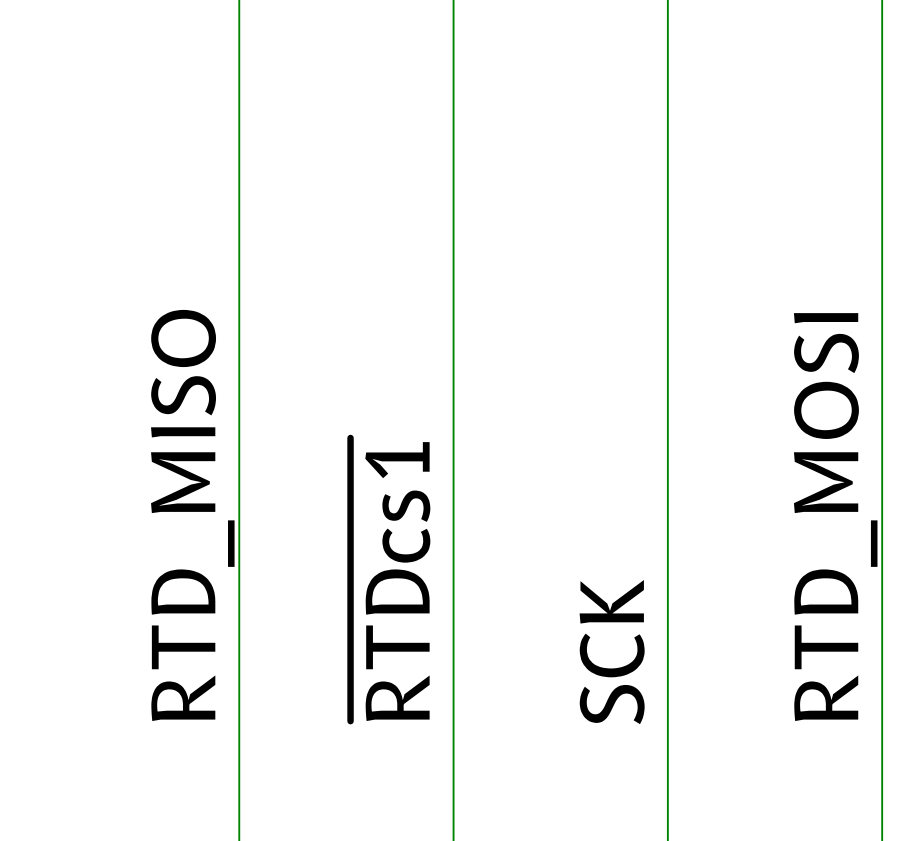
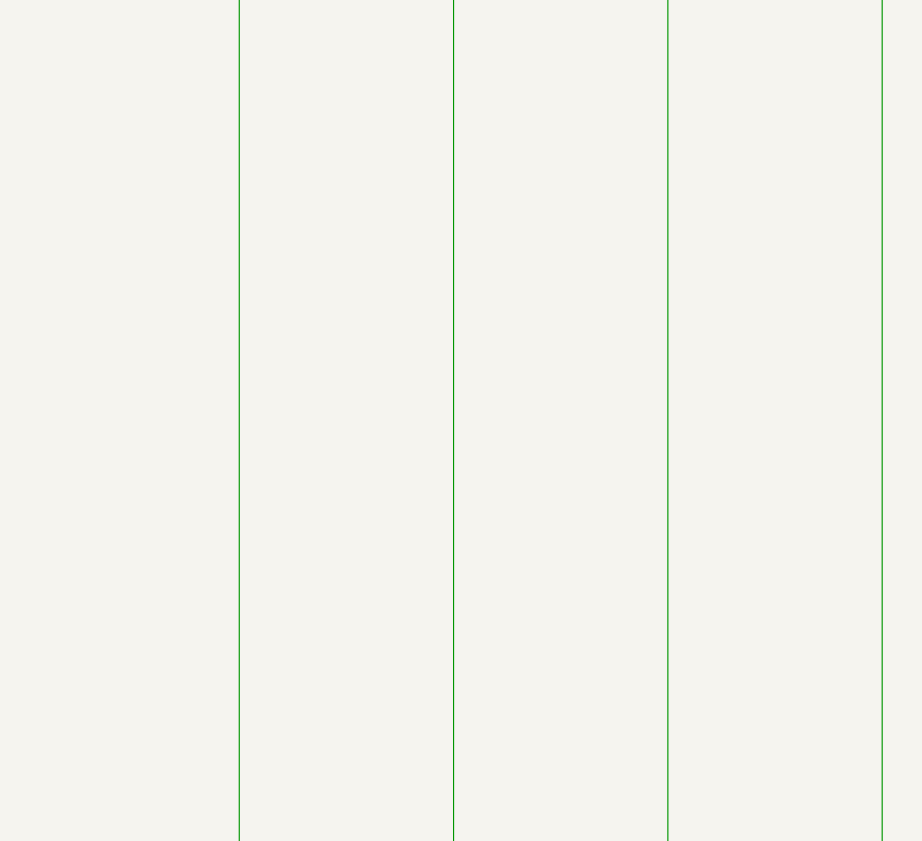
label: RTD_MISO (192, 515) -> none
label: RTD_MOSI (835, 517) -> none
label: ~{RTDcs1} (390, 579) -> none
label: SCK (612, 652) -> none

